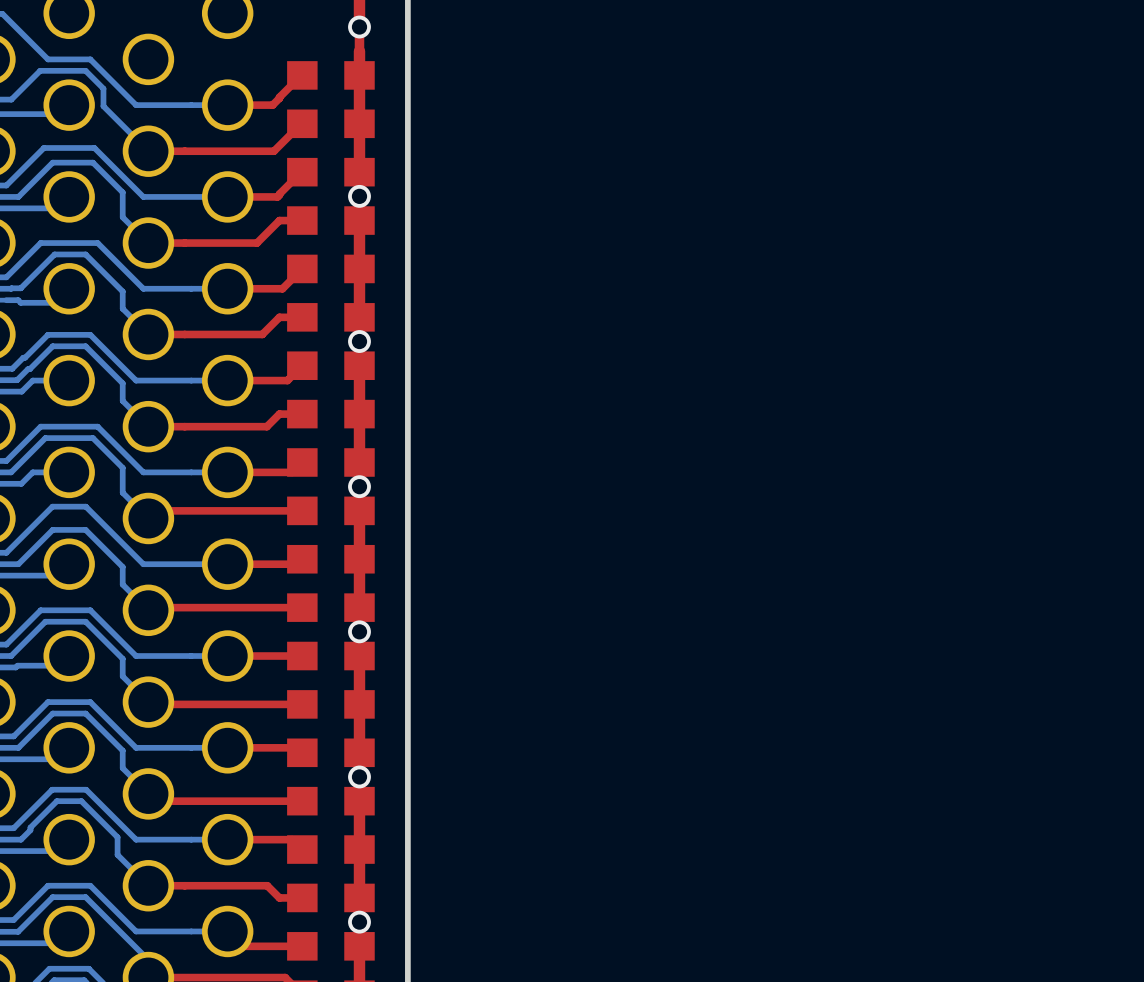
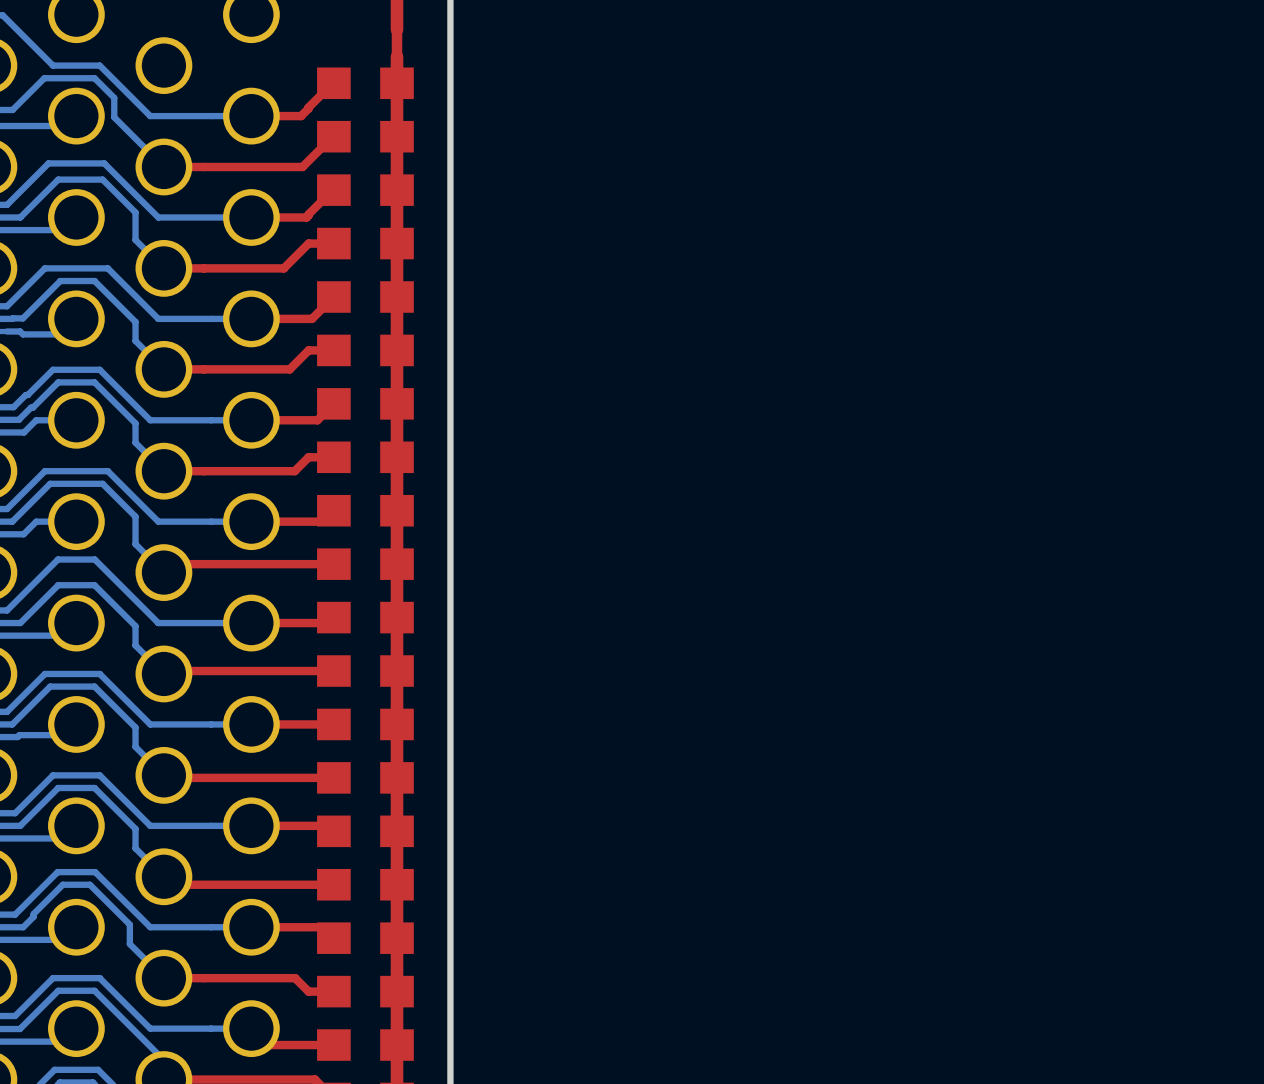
via: (359, 27) -> none
via: (359, 196) -> none
via: (359, 341) -> none
via: (359, 486) -> none
via: (359, 631) -> none
via: (359, 776) -> none
via: (359, 922) -> none

